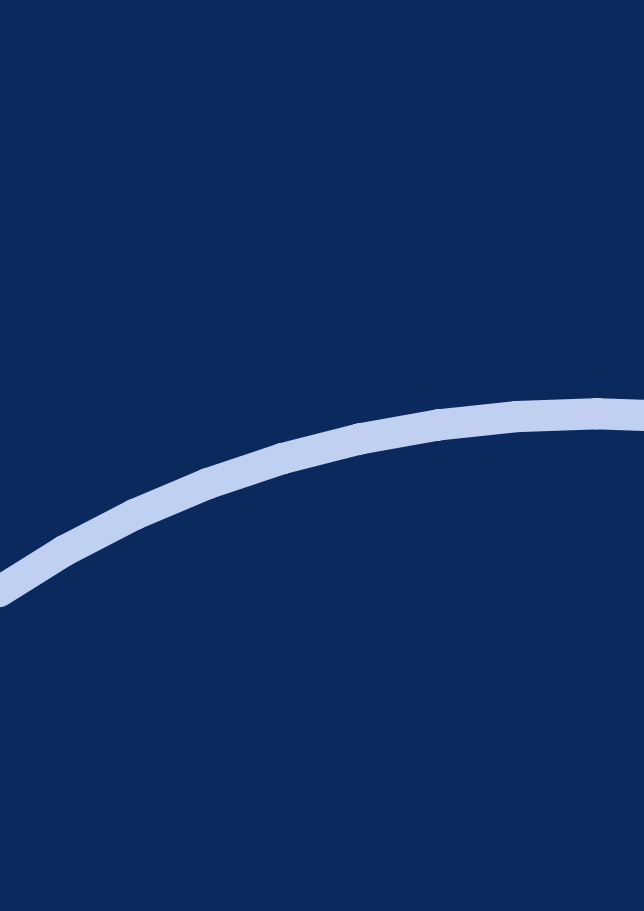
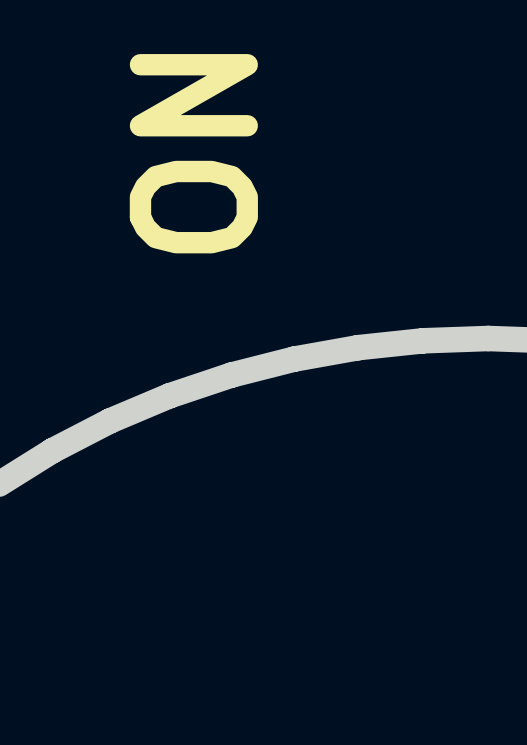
text: none -> ON (193, 153)

